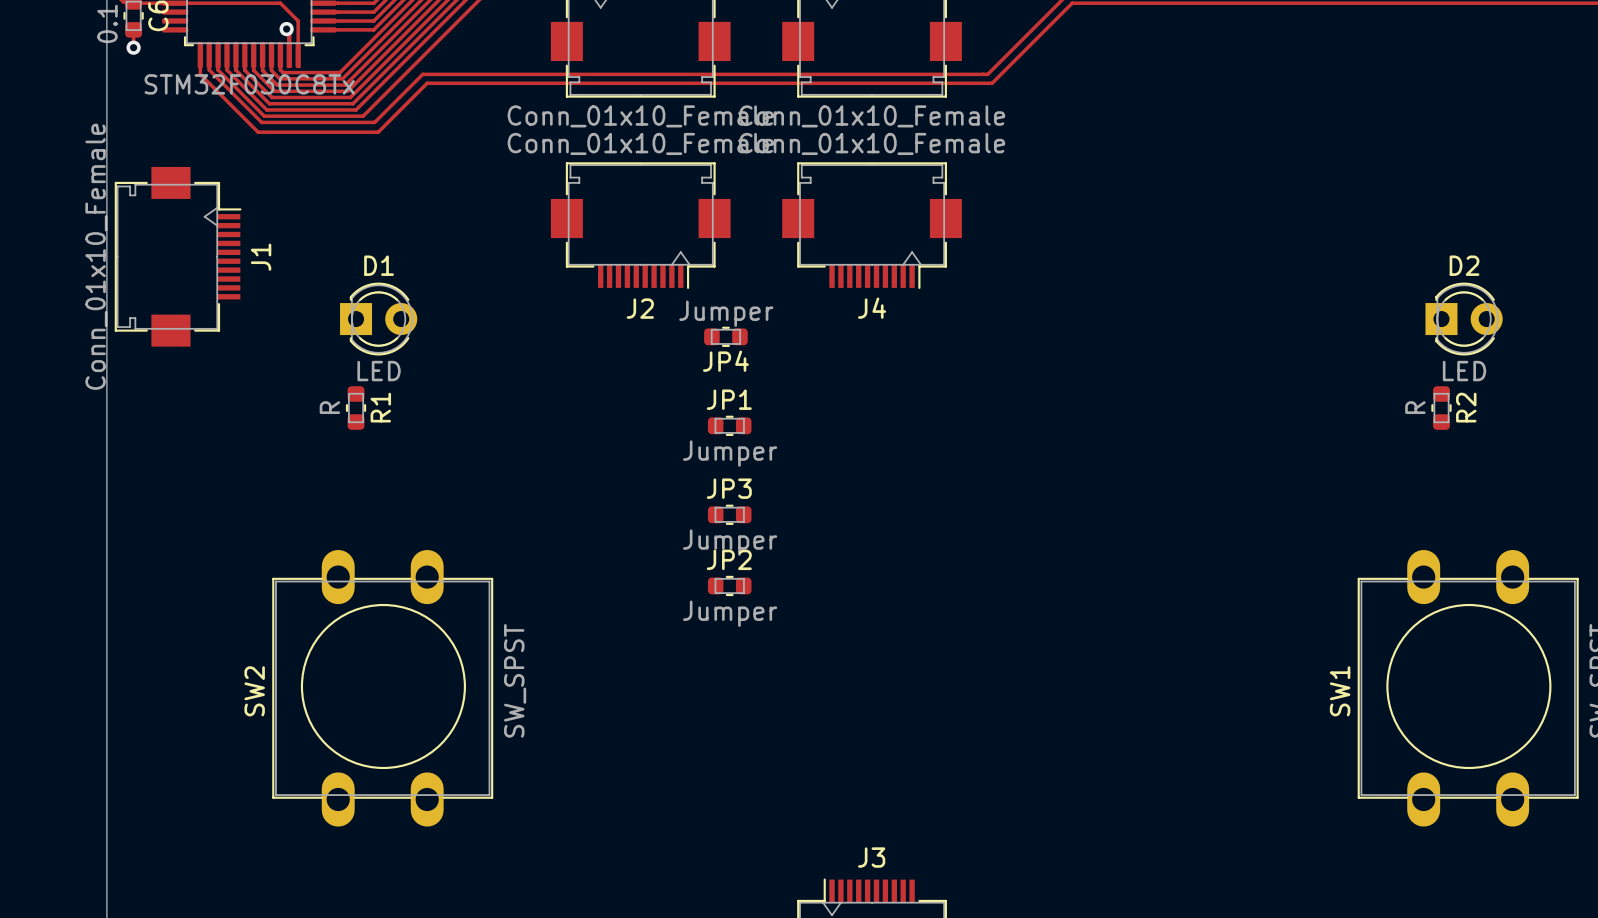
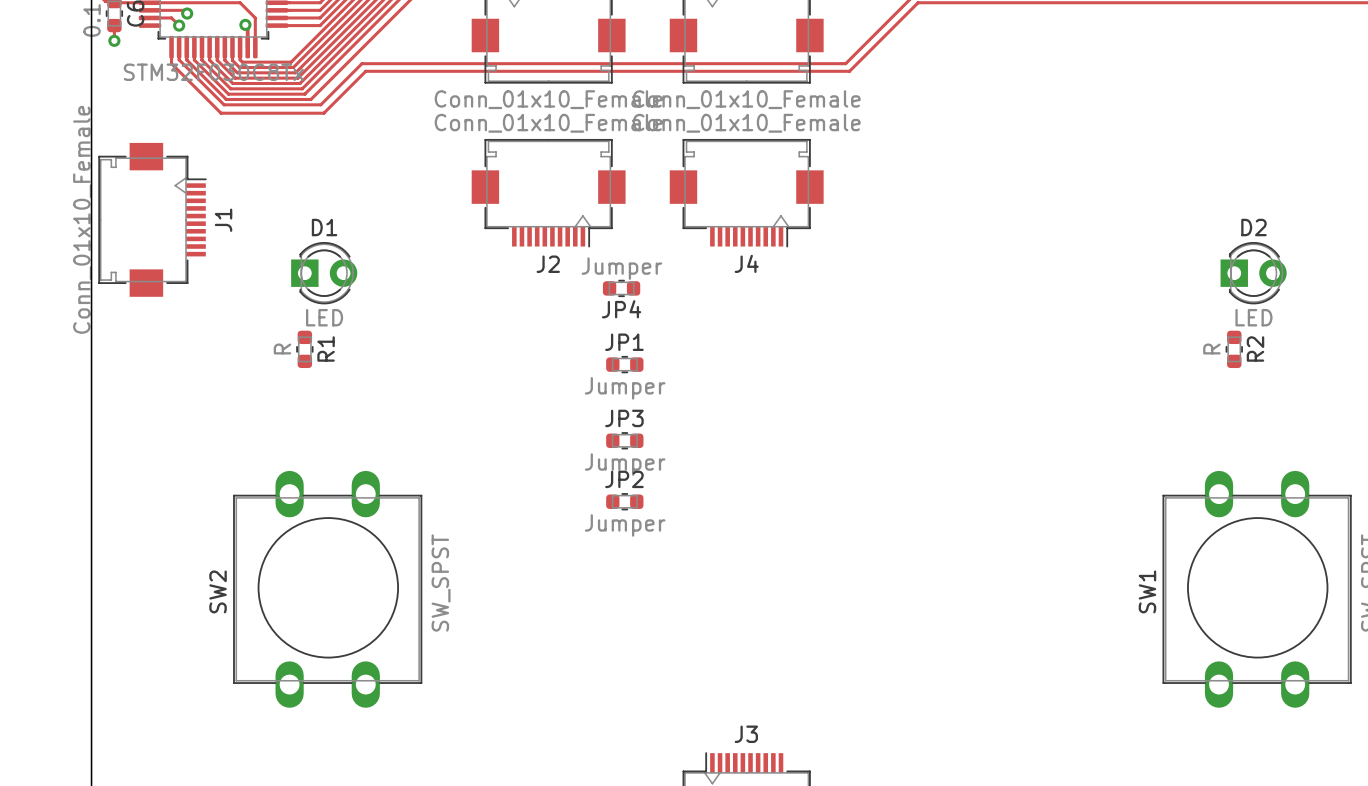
track: none -> (150, 10) (183, 10) (187, 13)
via: none -> (187, 13)
track: none -> (150, 17) (171, 17) (179, 25)
via: none -> (179, 25)

